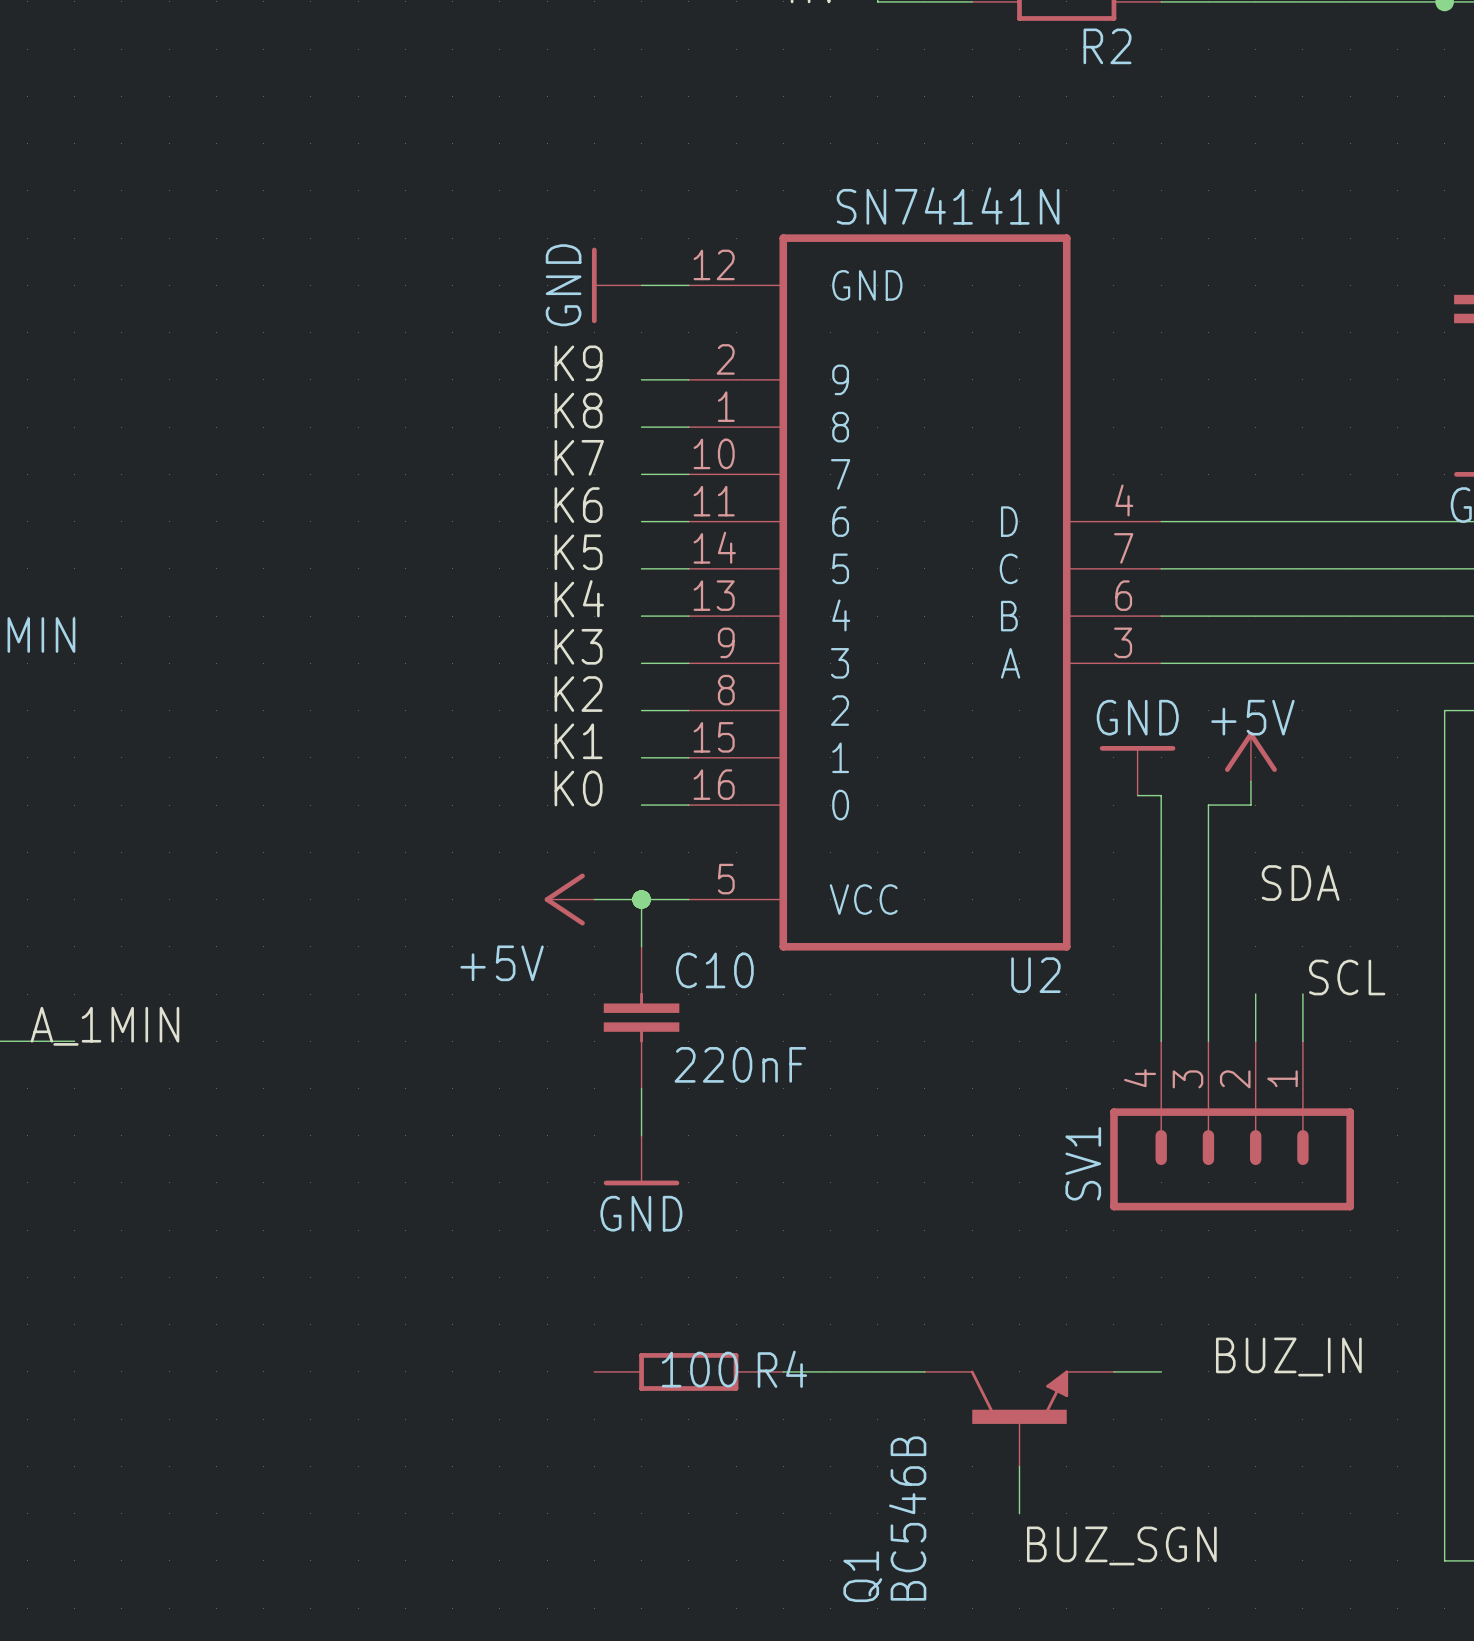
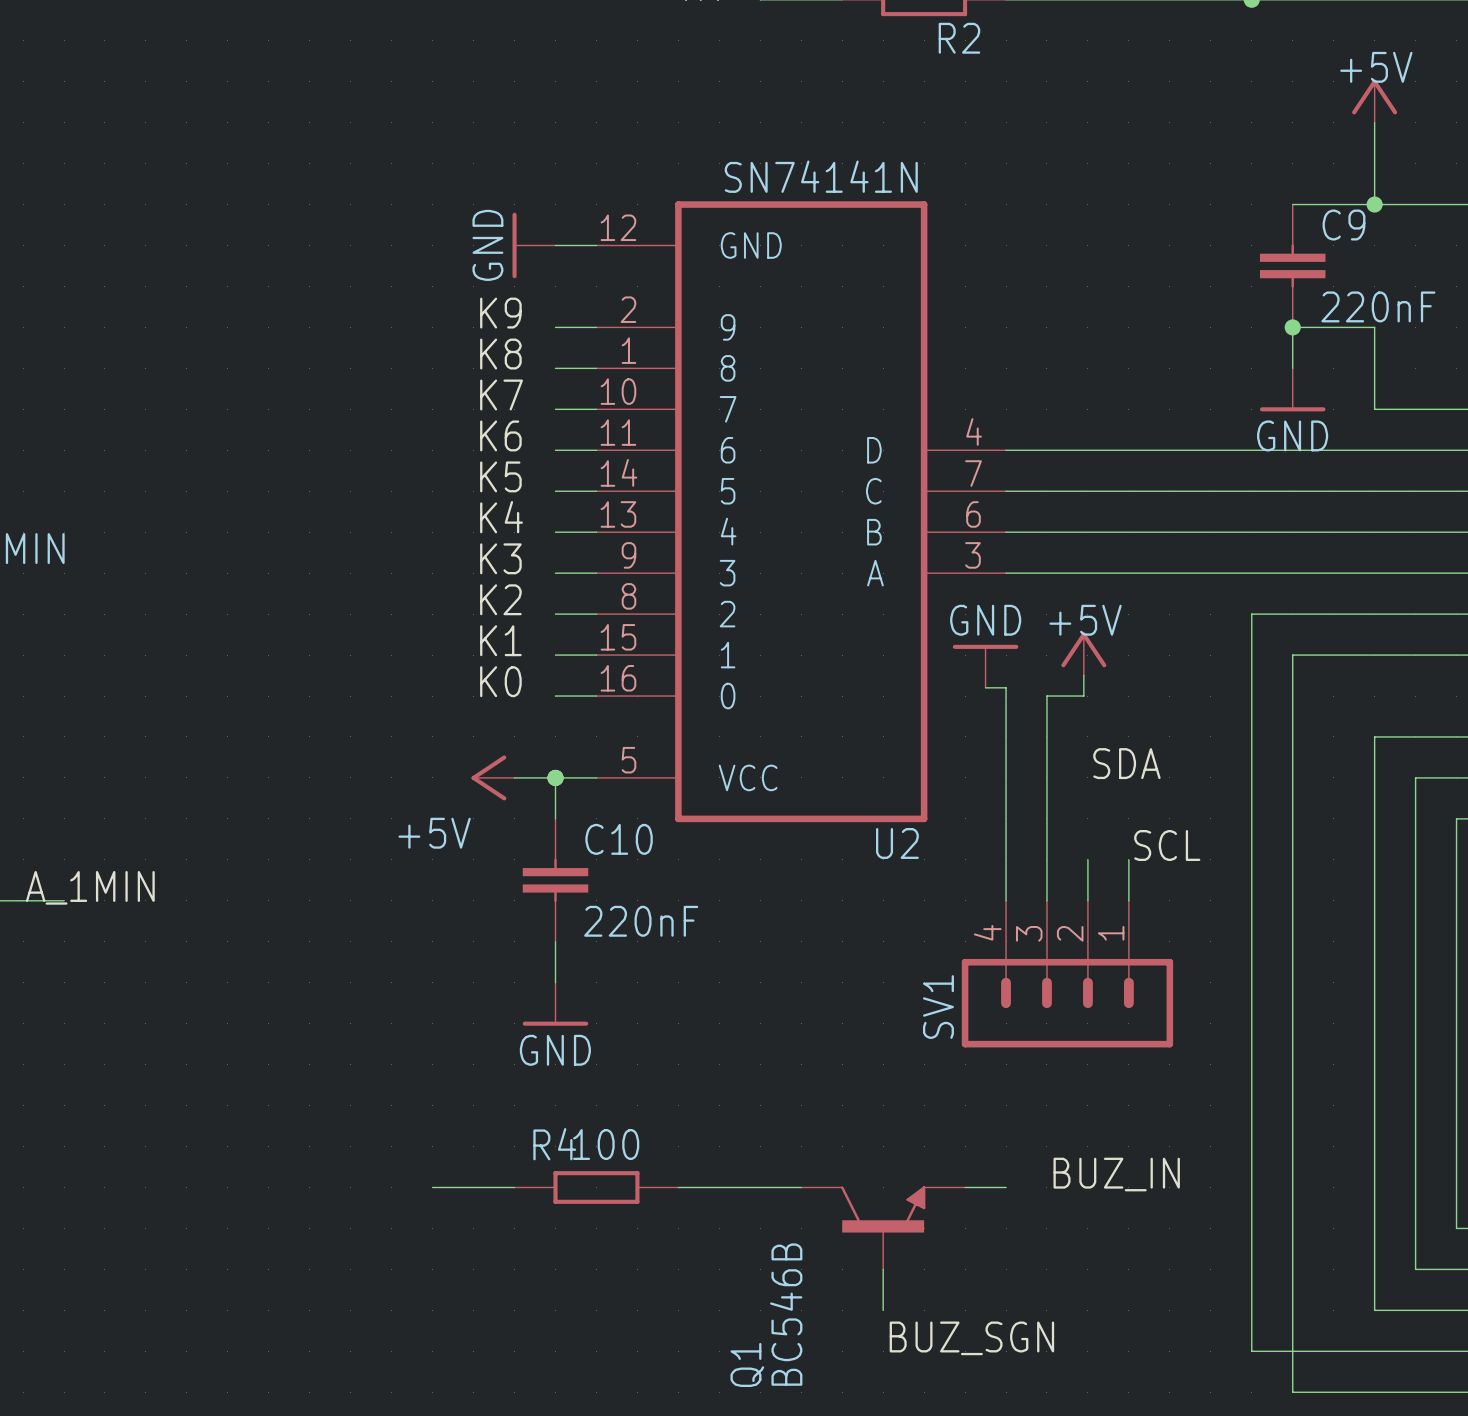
R4 value position: 100 (699, 1369) -> 100 (606, 1144)
R4 name position: R4 (782, 1369) -> R4 (554, 1144)
wire: none -> (432, 1187) (514, 1187)

